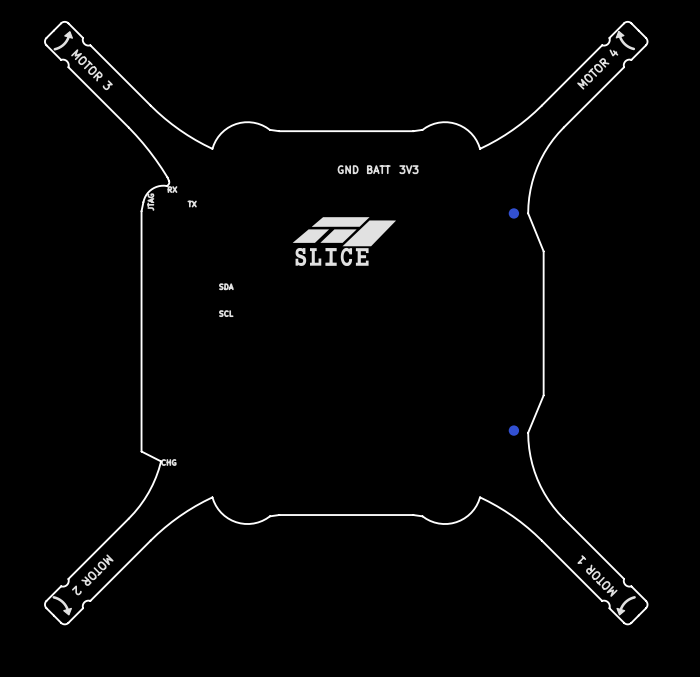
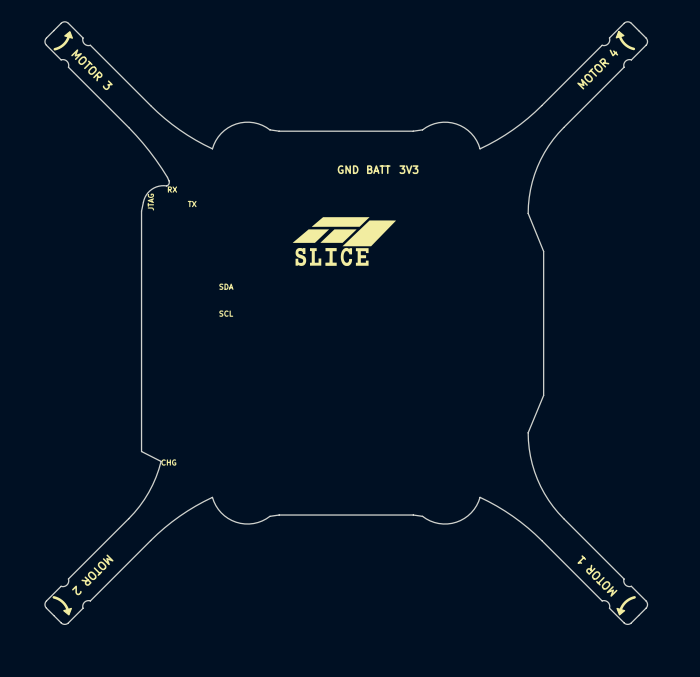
part: (513, 213) -> none
part: (513, 430) -> none

